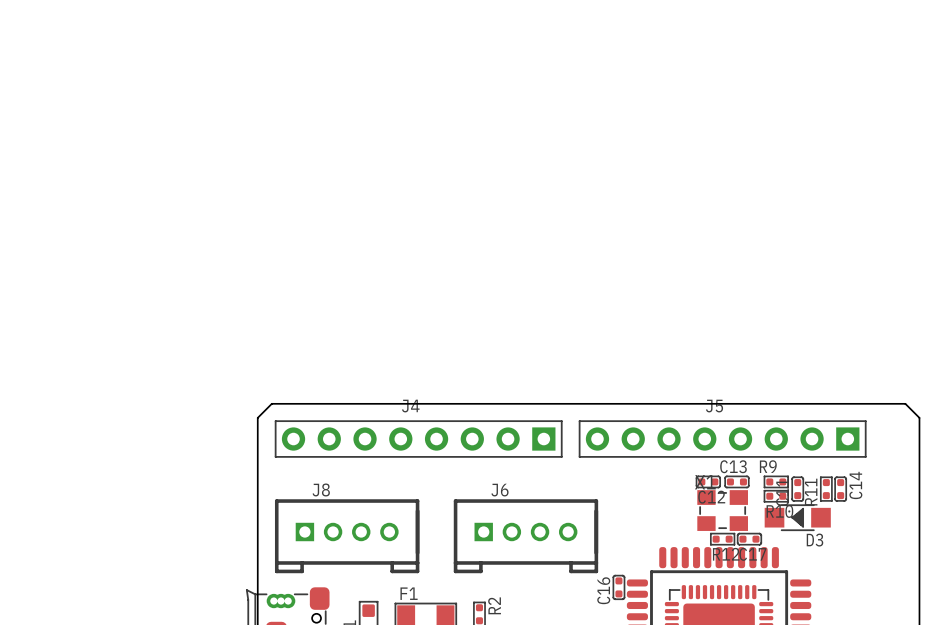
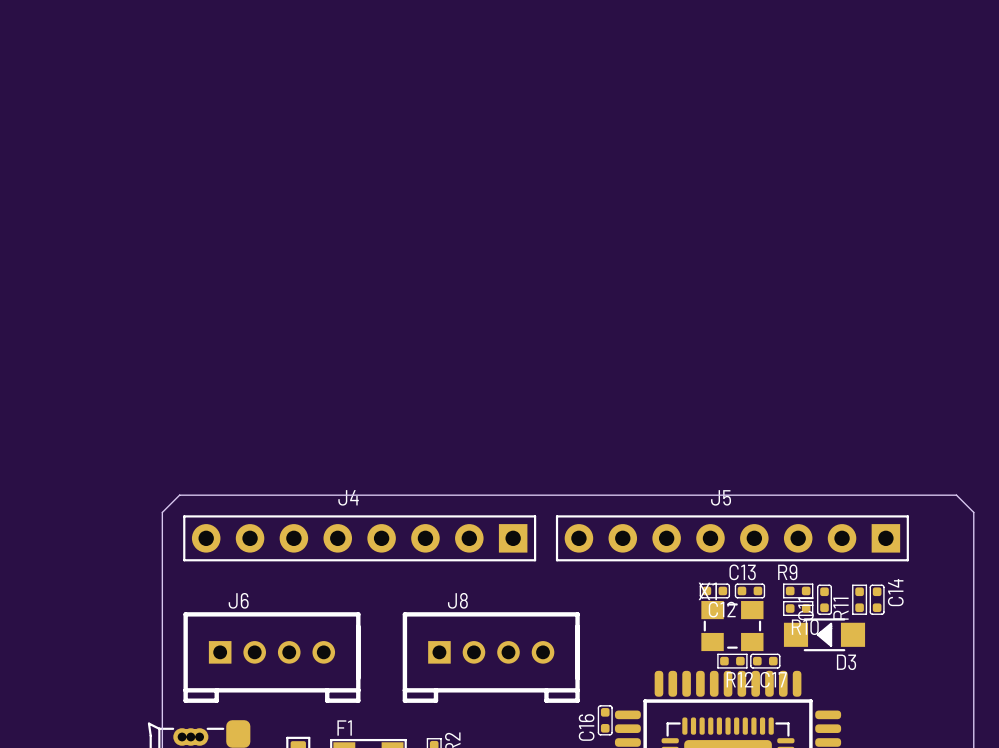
J8 name: J8 (321, 489) -> J6 (238, 600)
J6 name: J6 (499, 490) -> J8 (457, 600)

